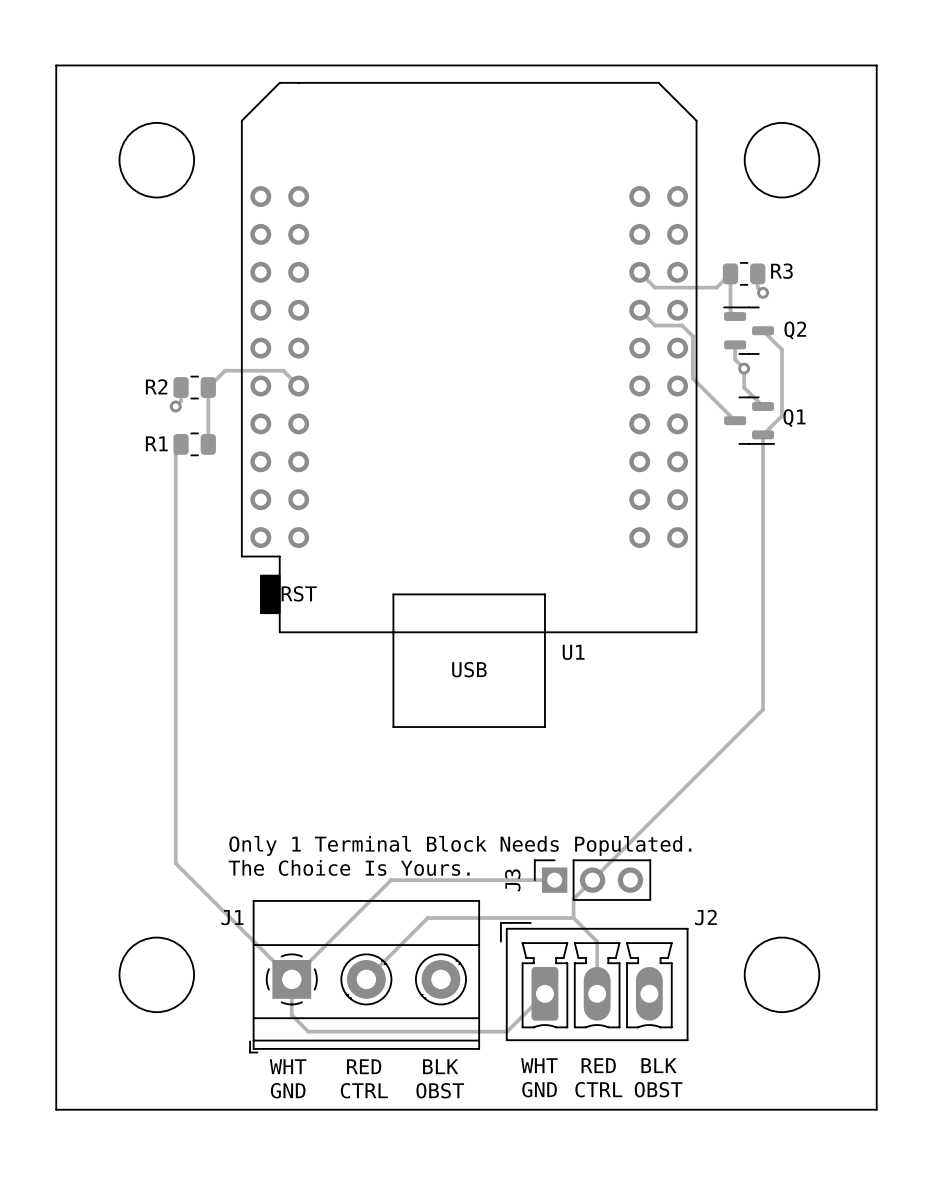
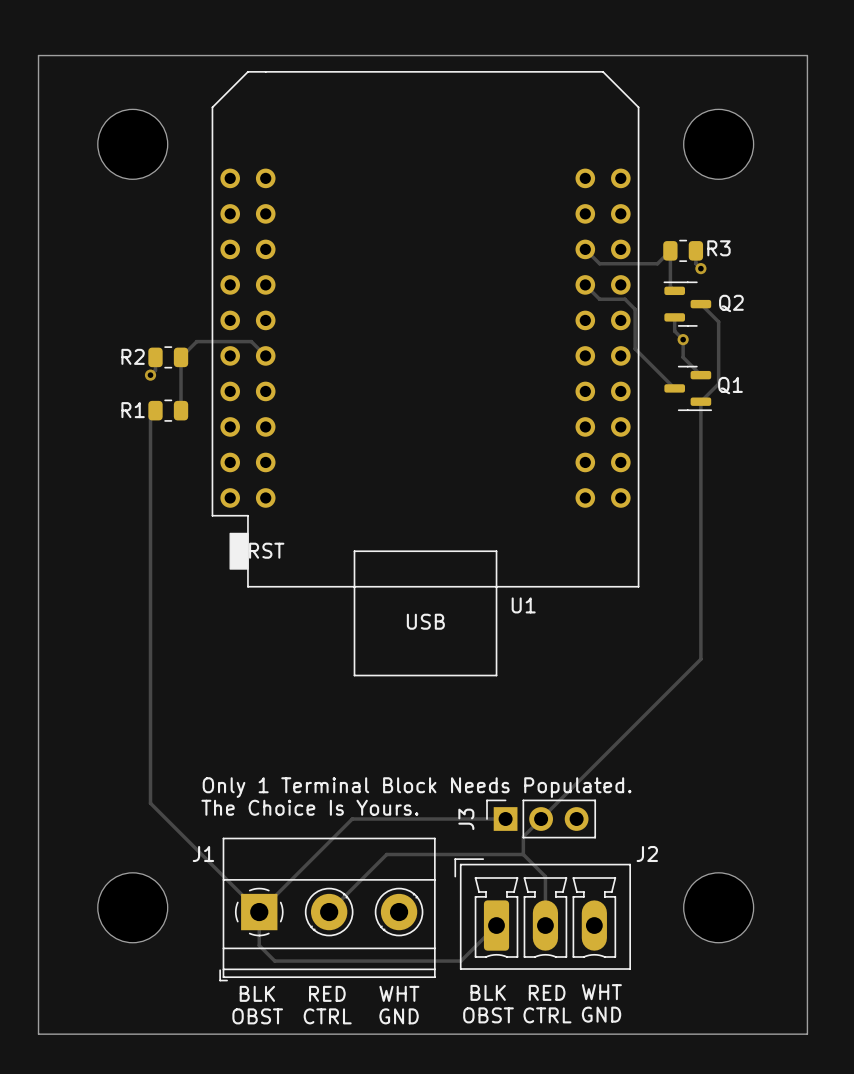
text: WHT (539, 1065) -> BLK (488, 992)
text: BLK (659, 1065) -> WHT (601, 992)
text: WHT (288, 1066) -> BLK (257, 993)
text: BLK (440, 1066) -> WHT (399, 993)
text: GND (539, 1089) -> OBST (488, 1015)
text: OBST (658, 1089) -> GND (601, 1014)
text: GND (288, 1090) -> OBST (257, 1016)
text: OBST (440, 1090) -> GND (399, 1016)

